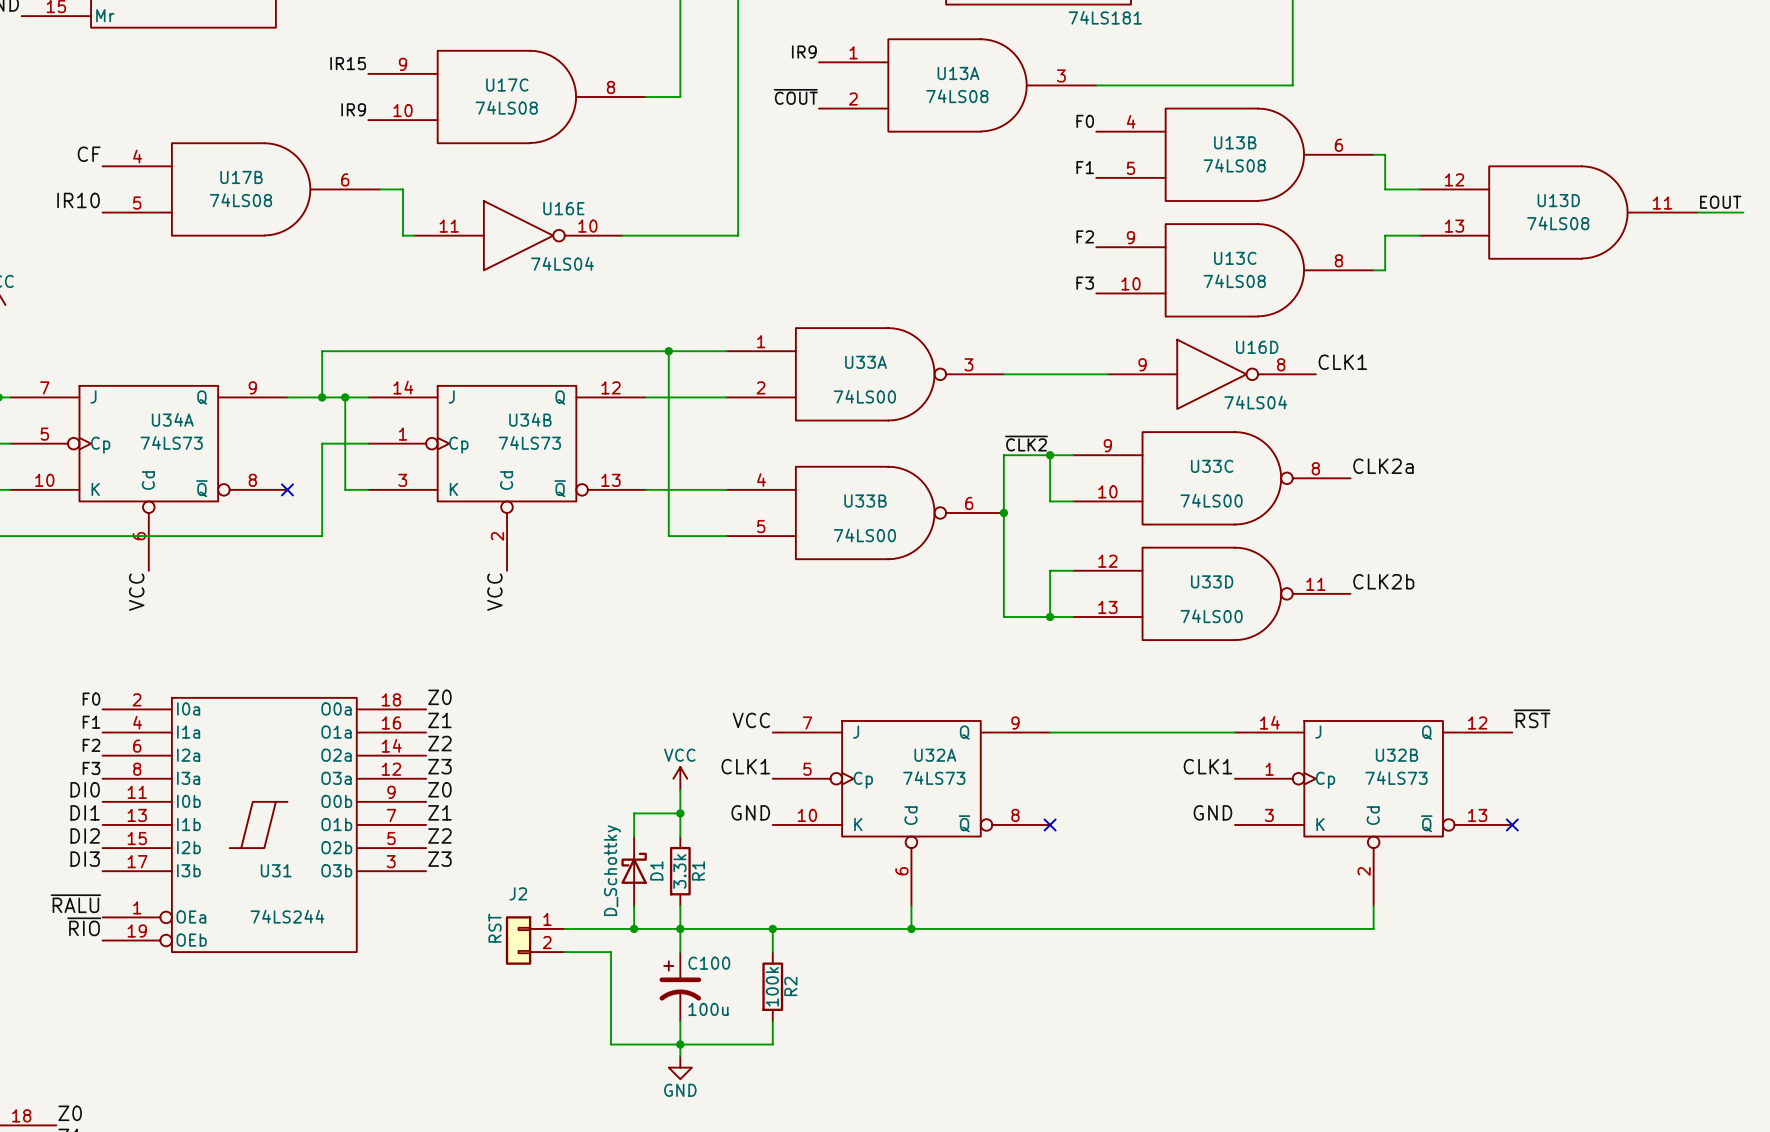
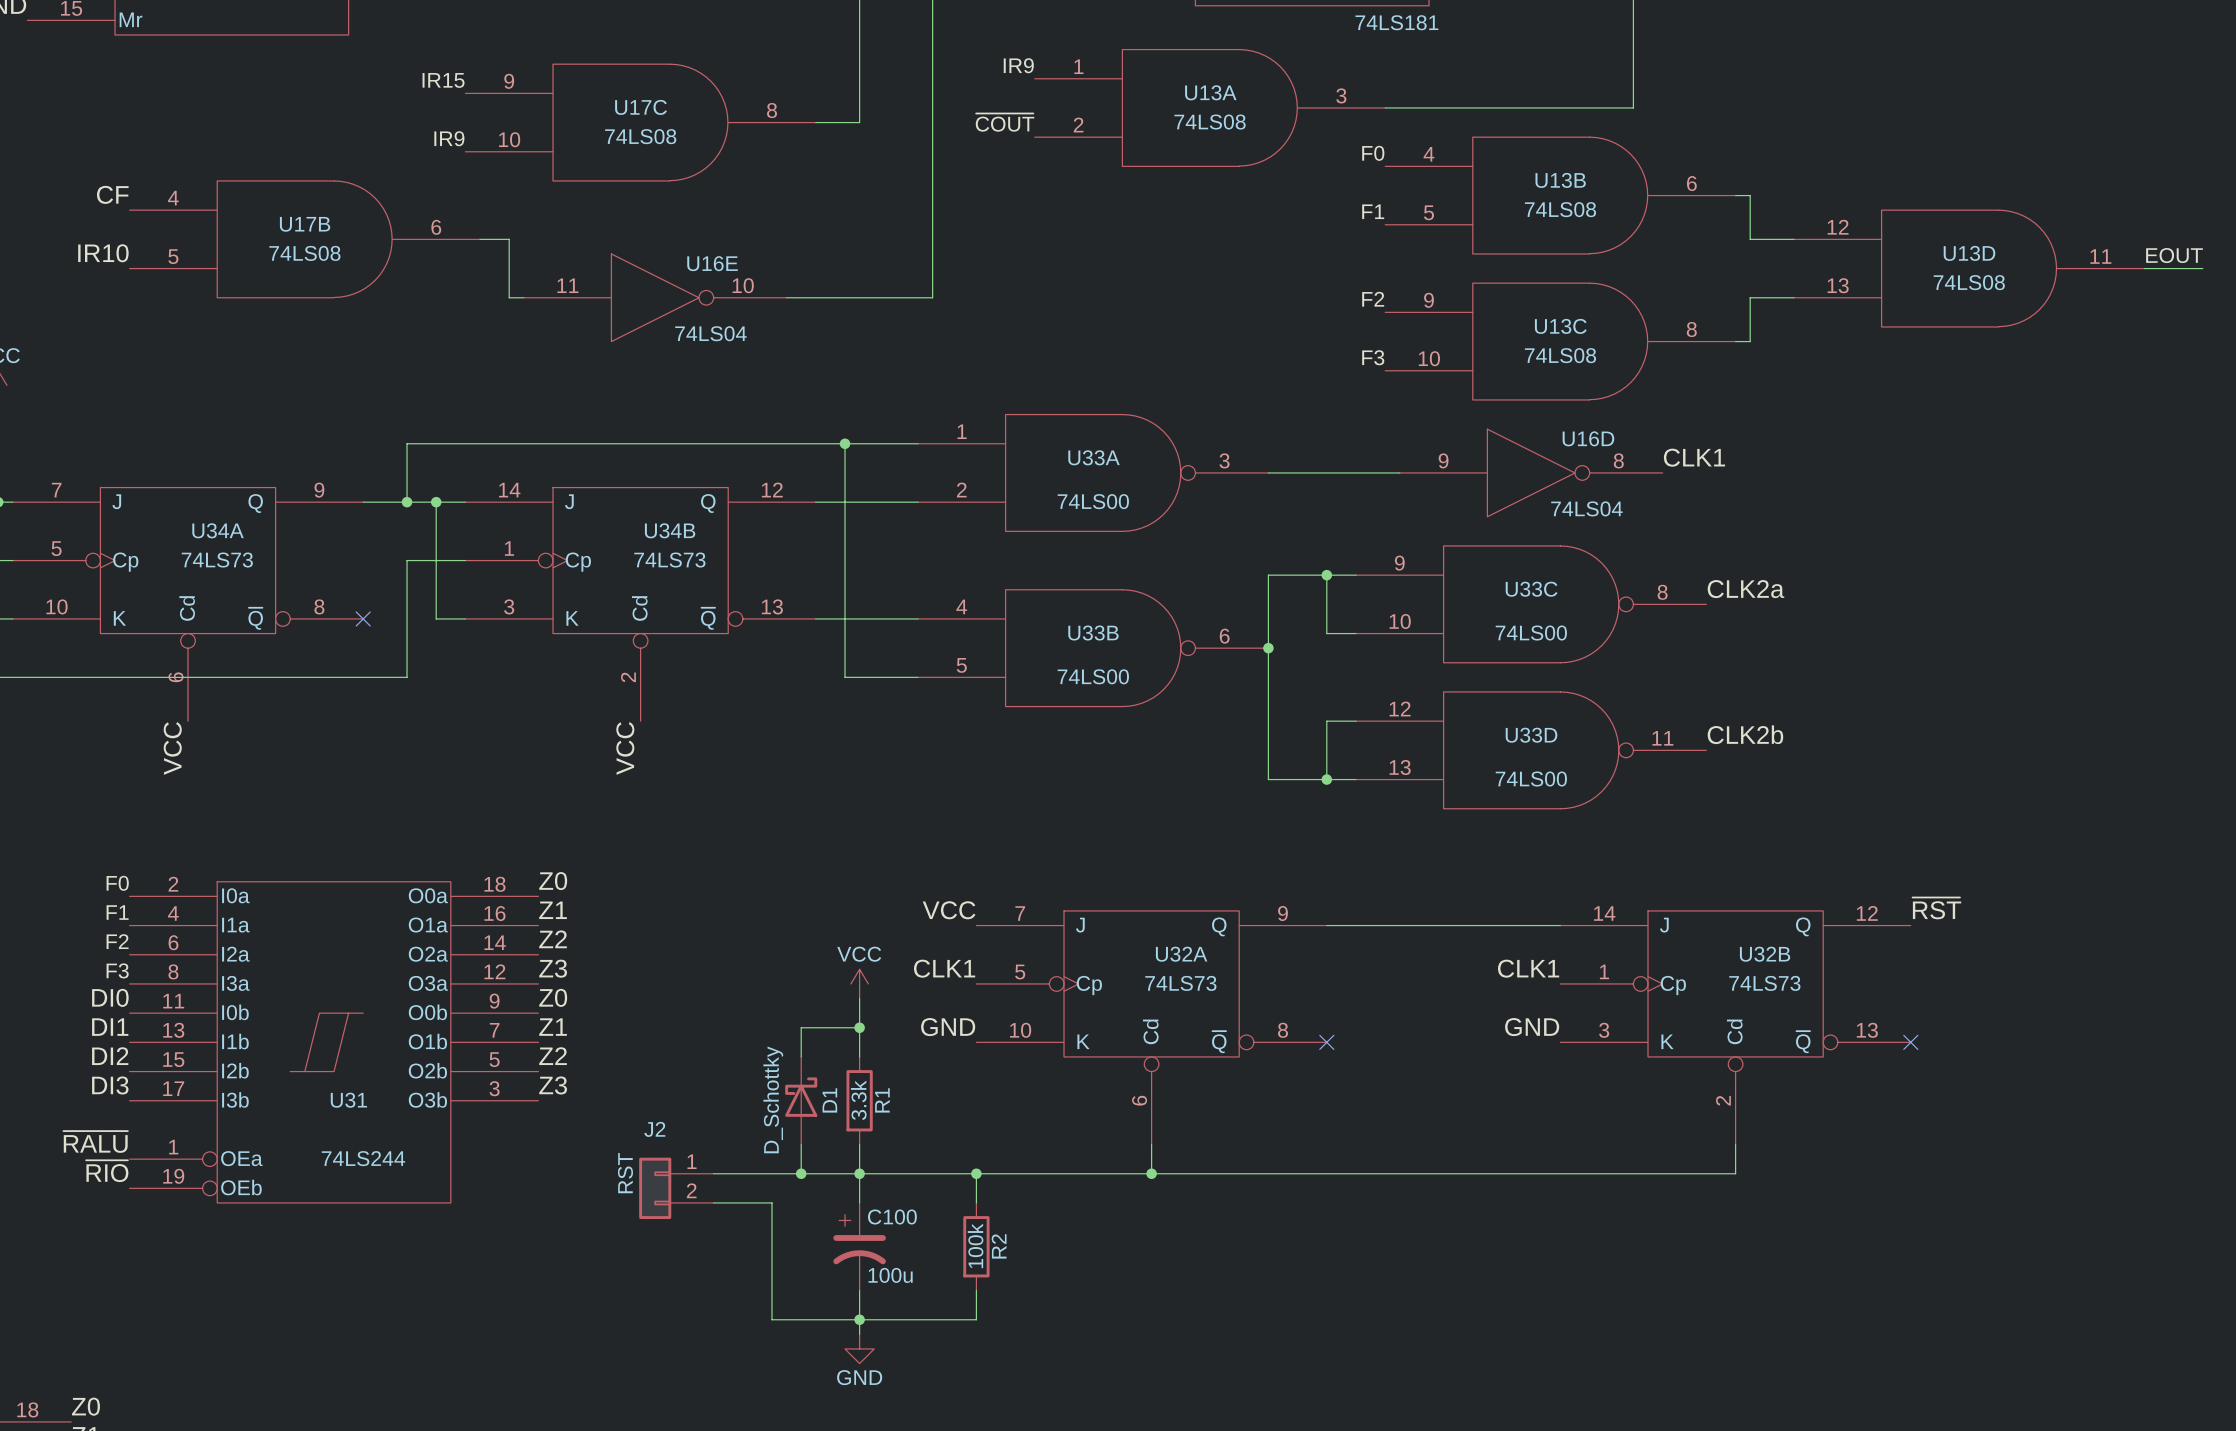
label: ~{CLK2} (1026, 443) -> none

